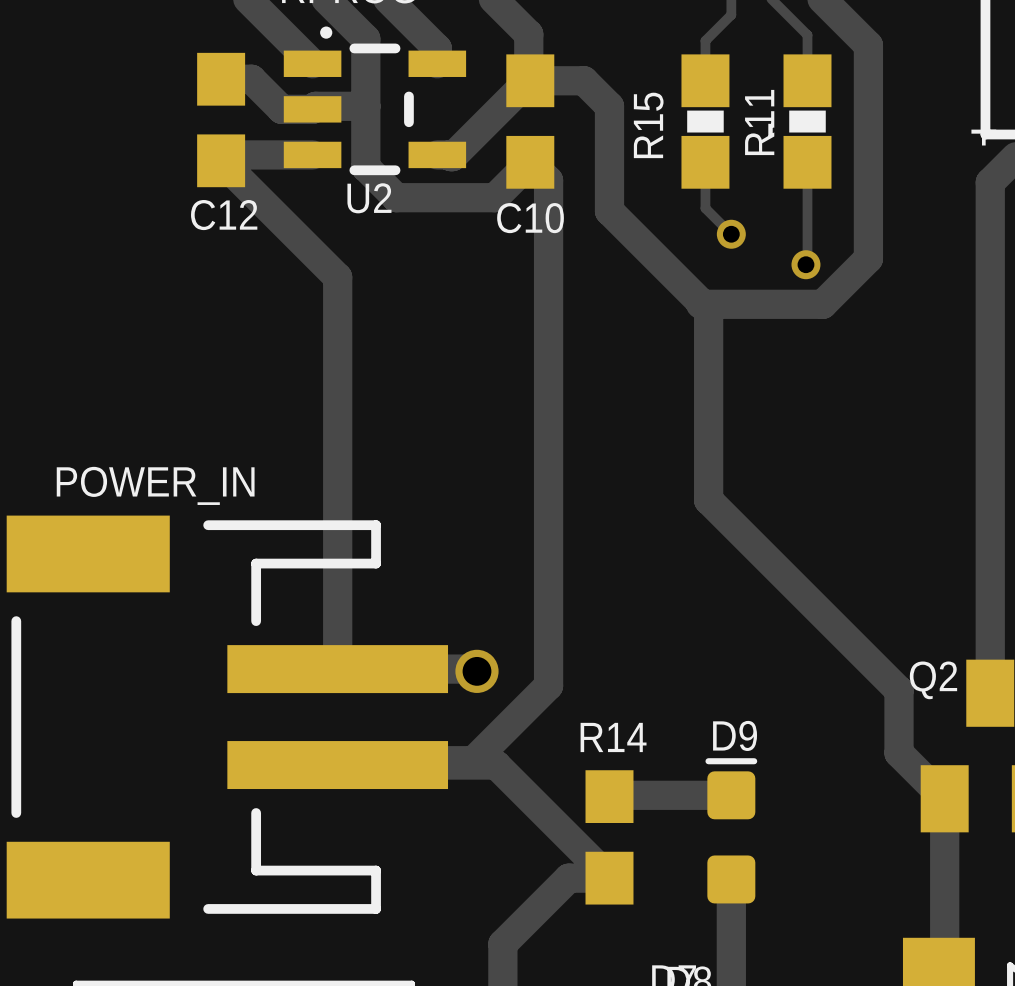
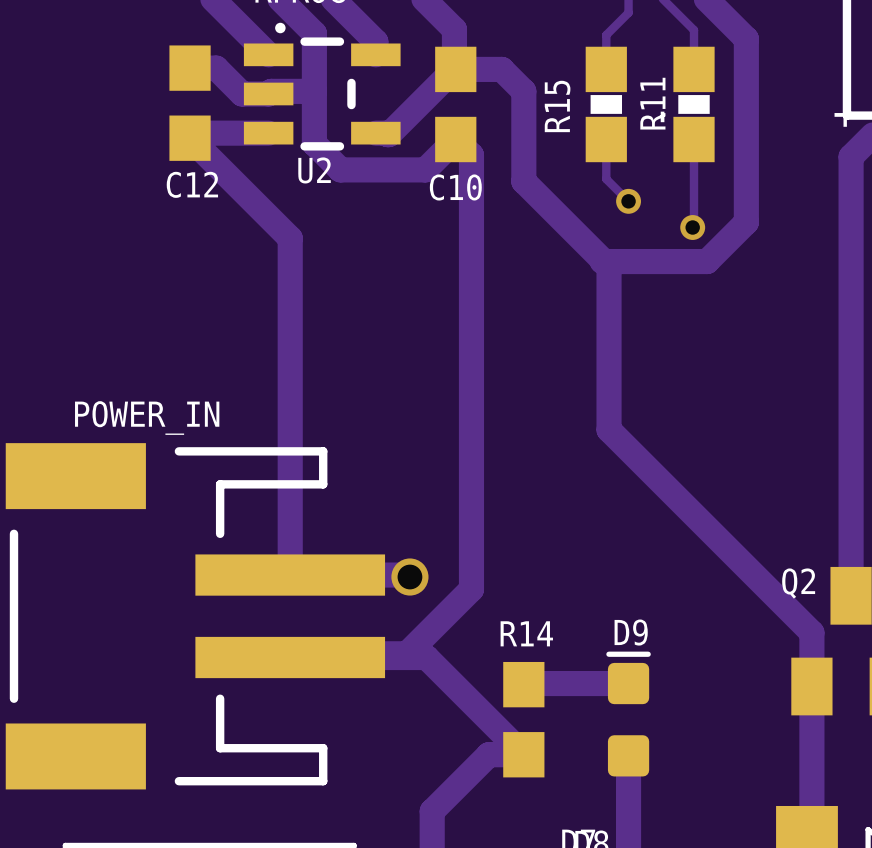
track: (899, 690) (899, 753) (944, 798) -> (772, 593) (811, 632) (811, 686)

